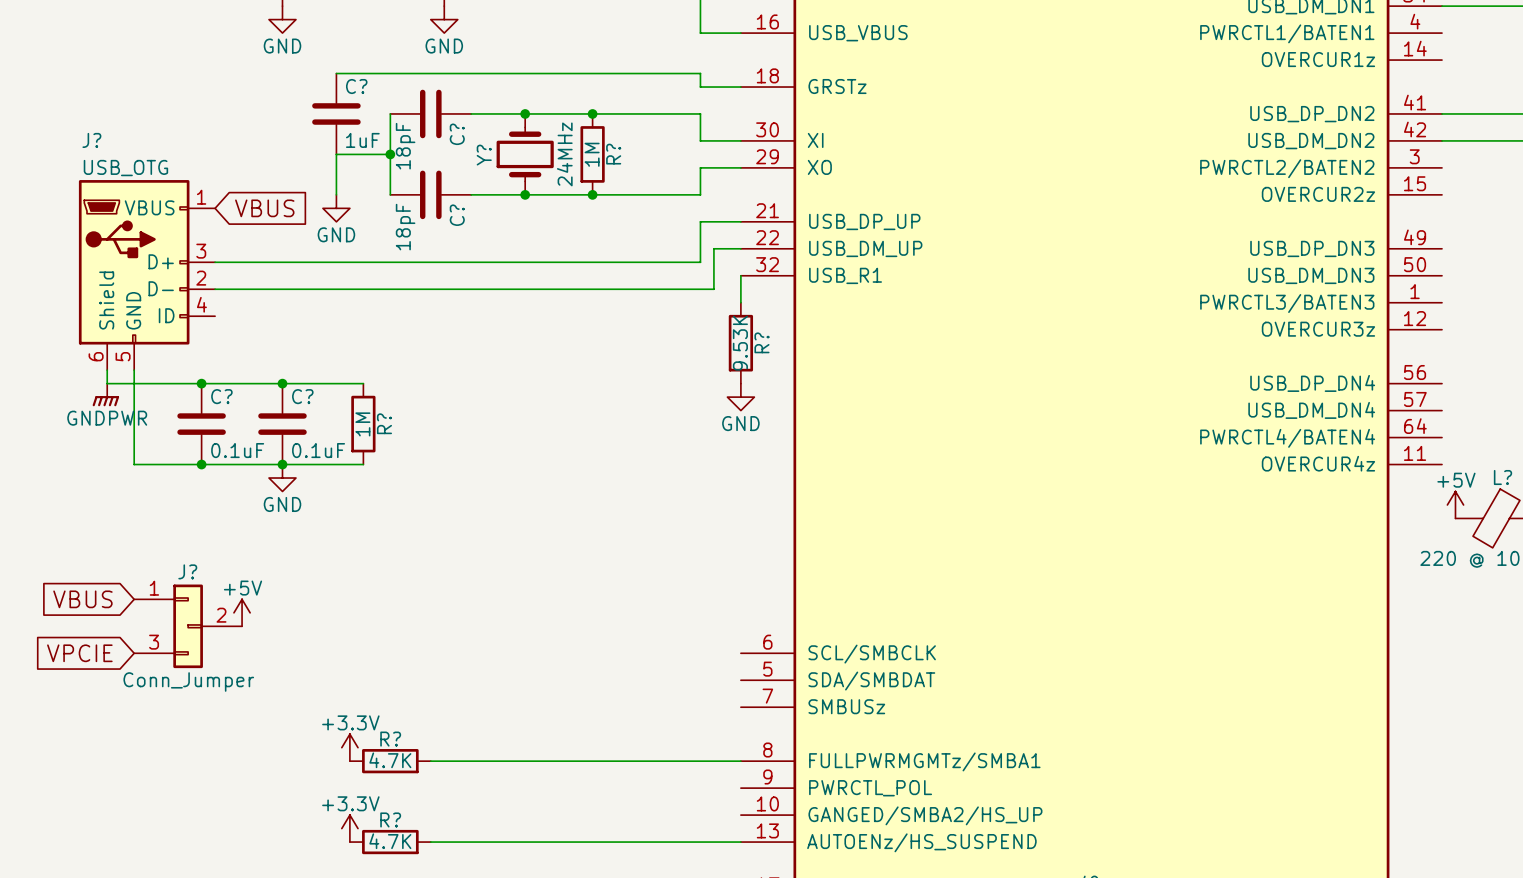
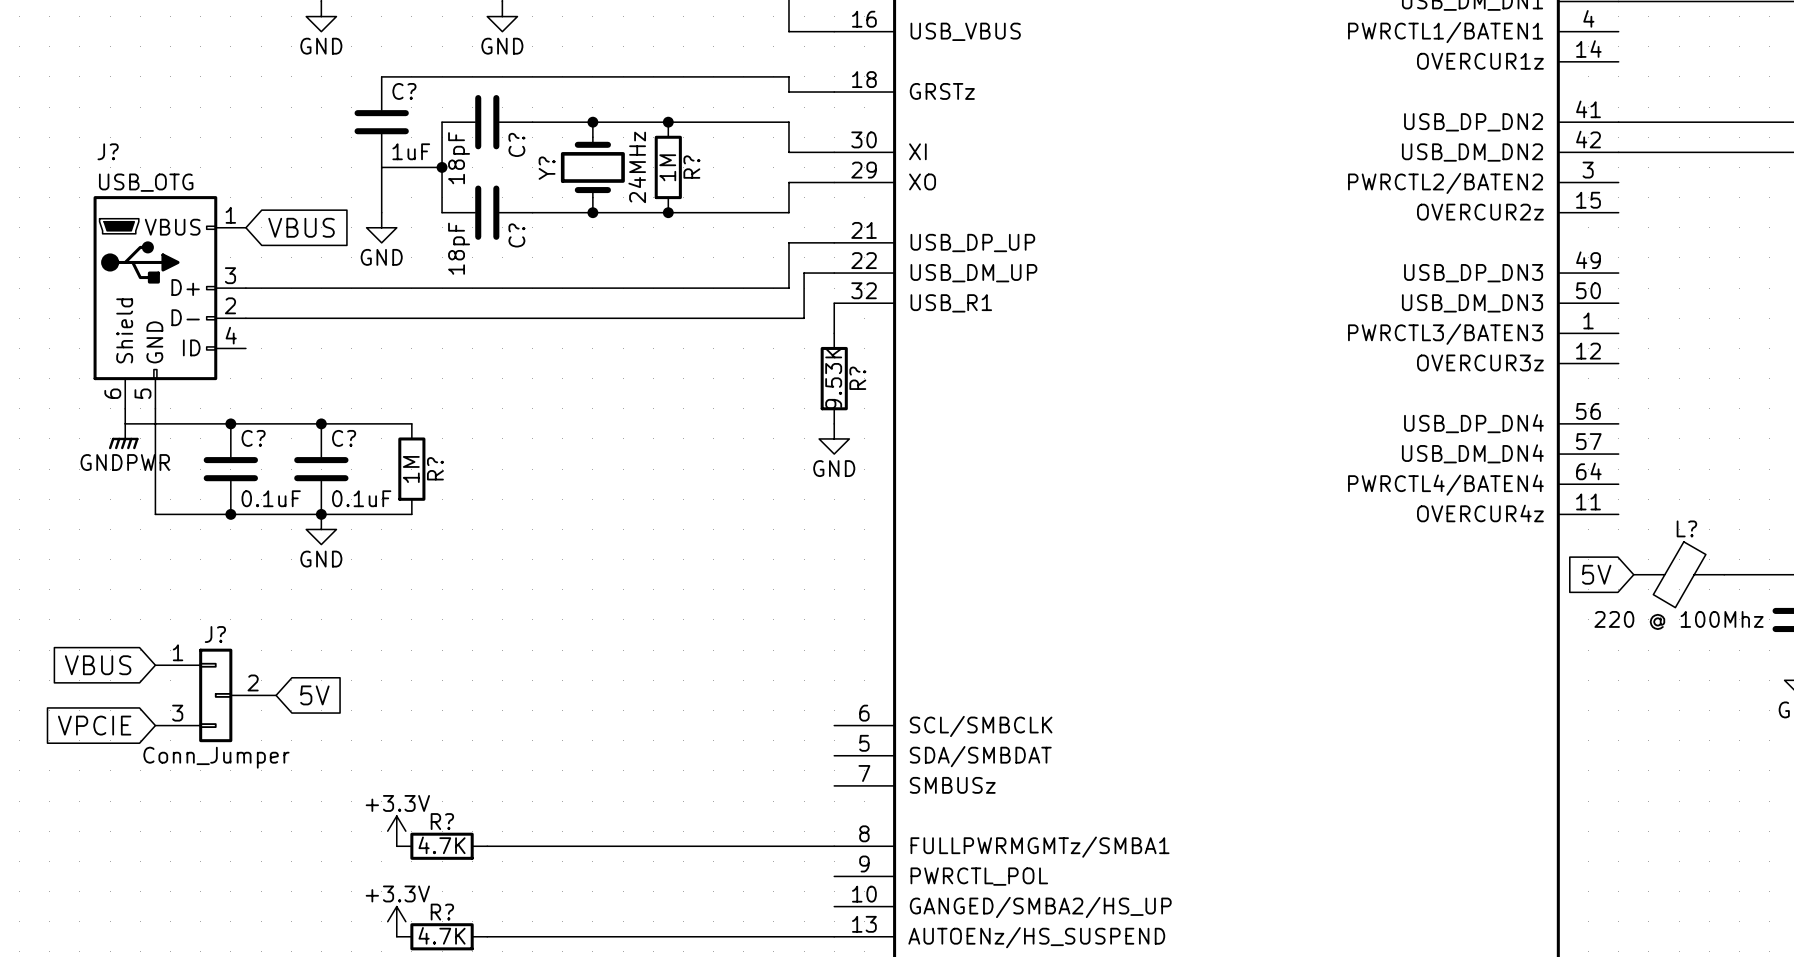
power symbol: +5V (1455, 504) -> none
global label: none -> 5V (1596, 574)
power symbol: +5V (242, 612) -> none
global label: none -> 5V (314, 695)

